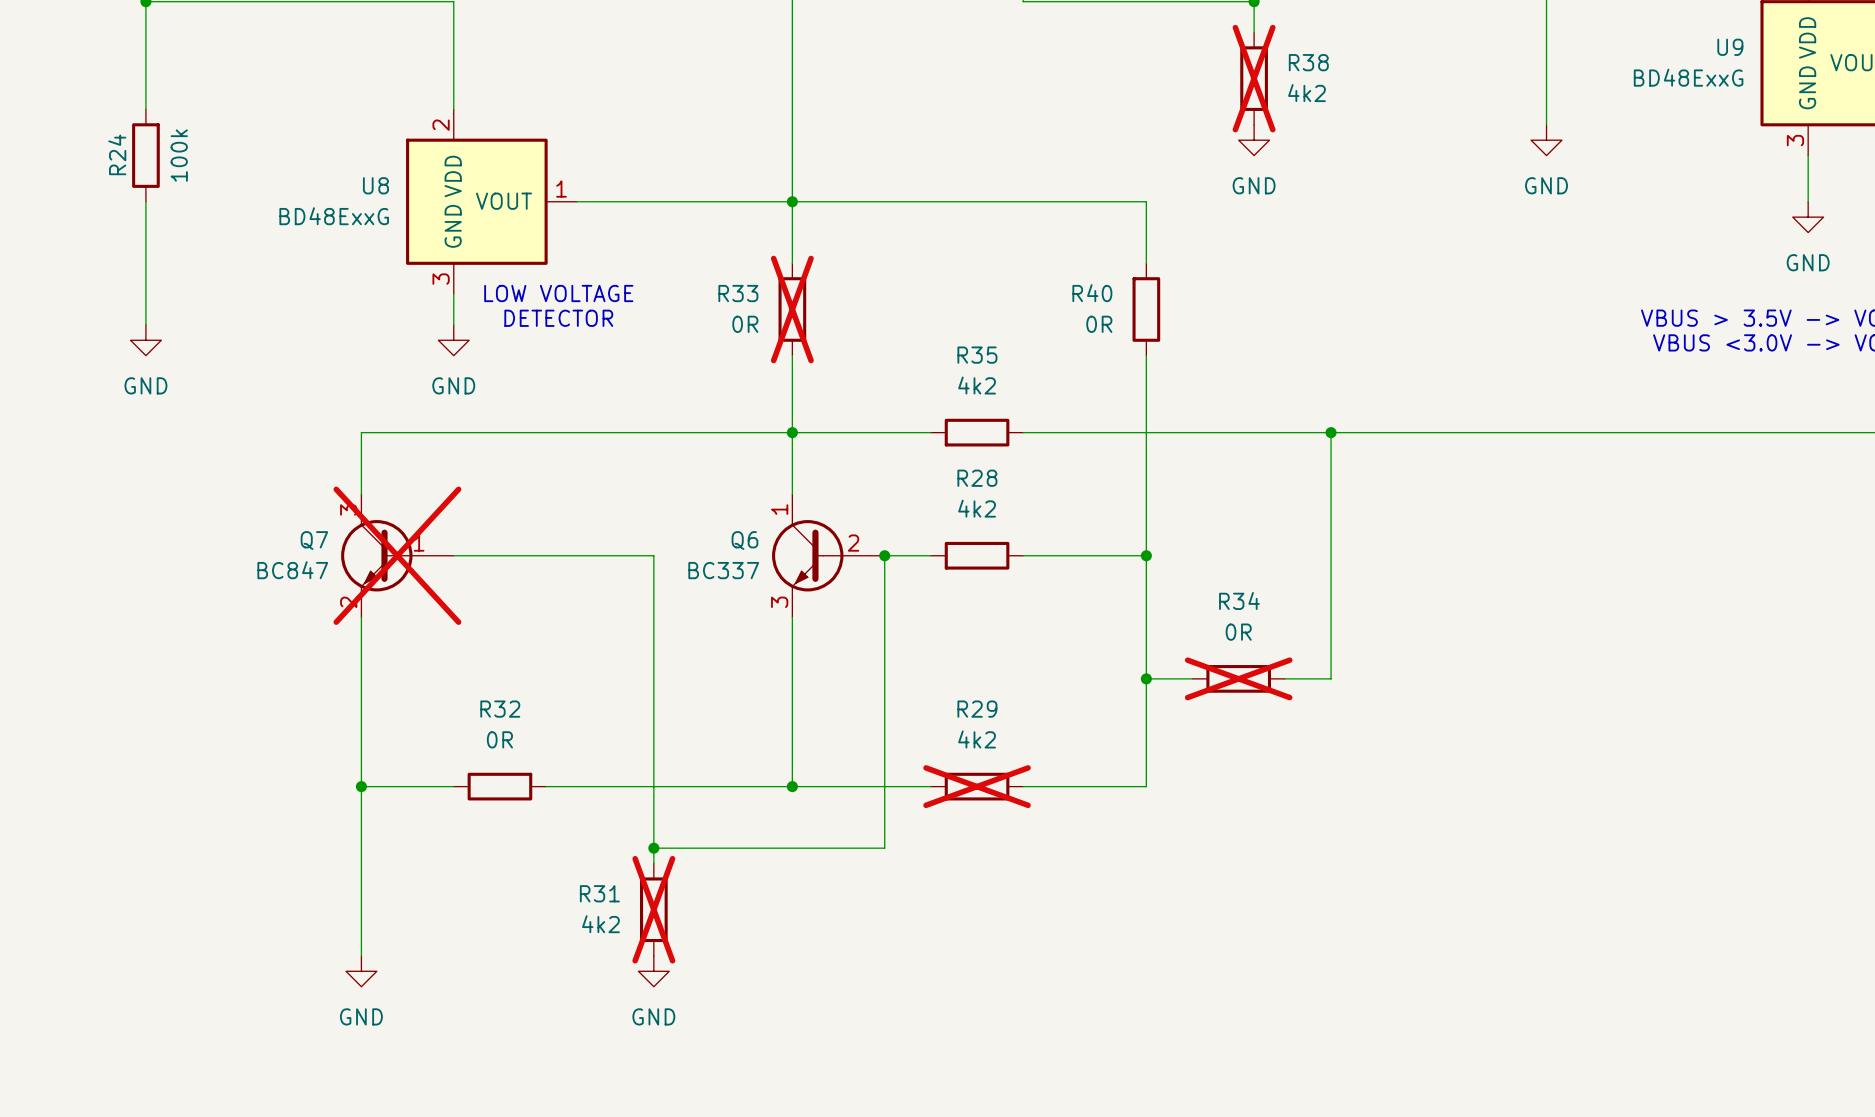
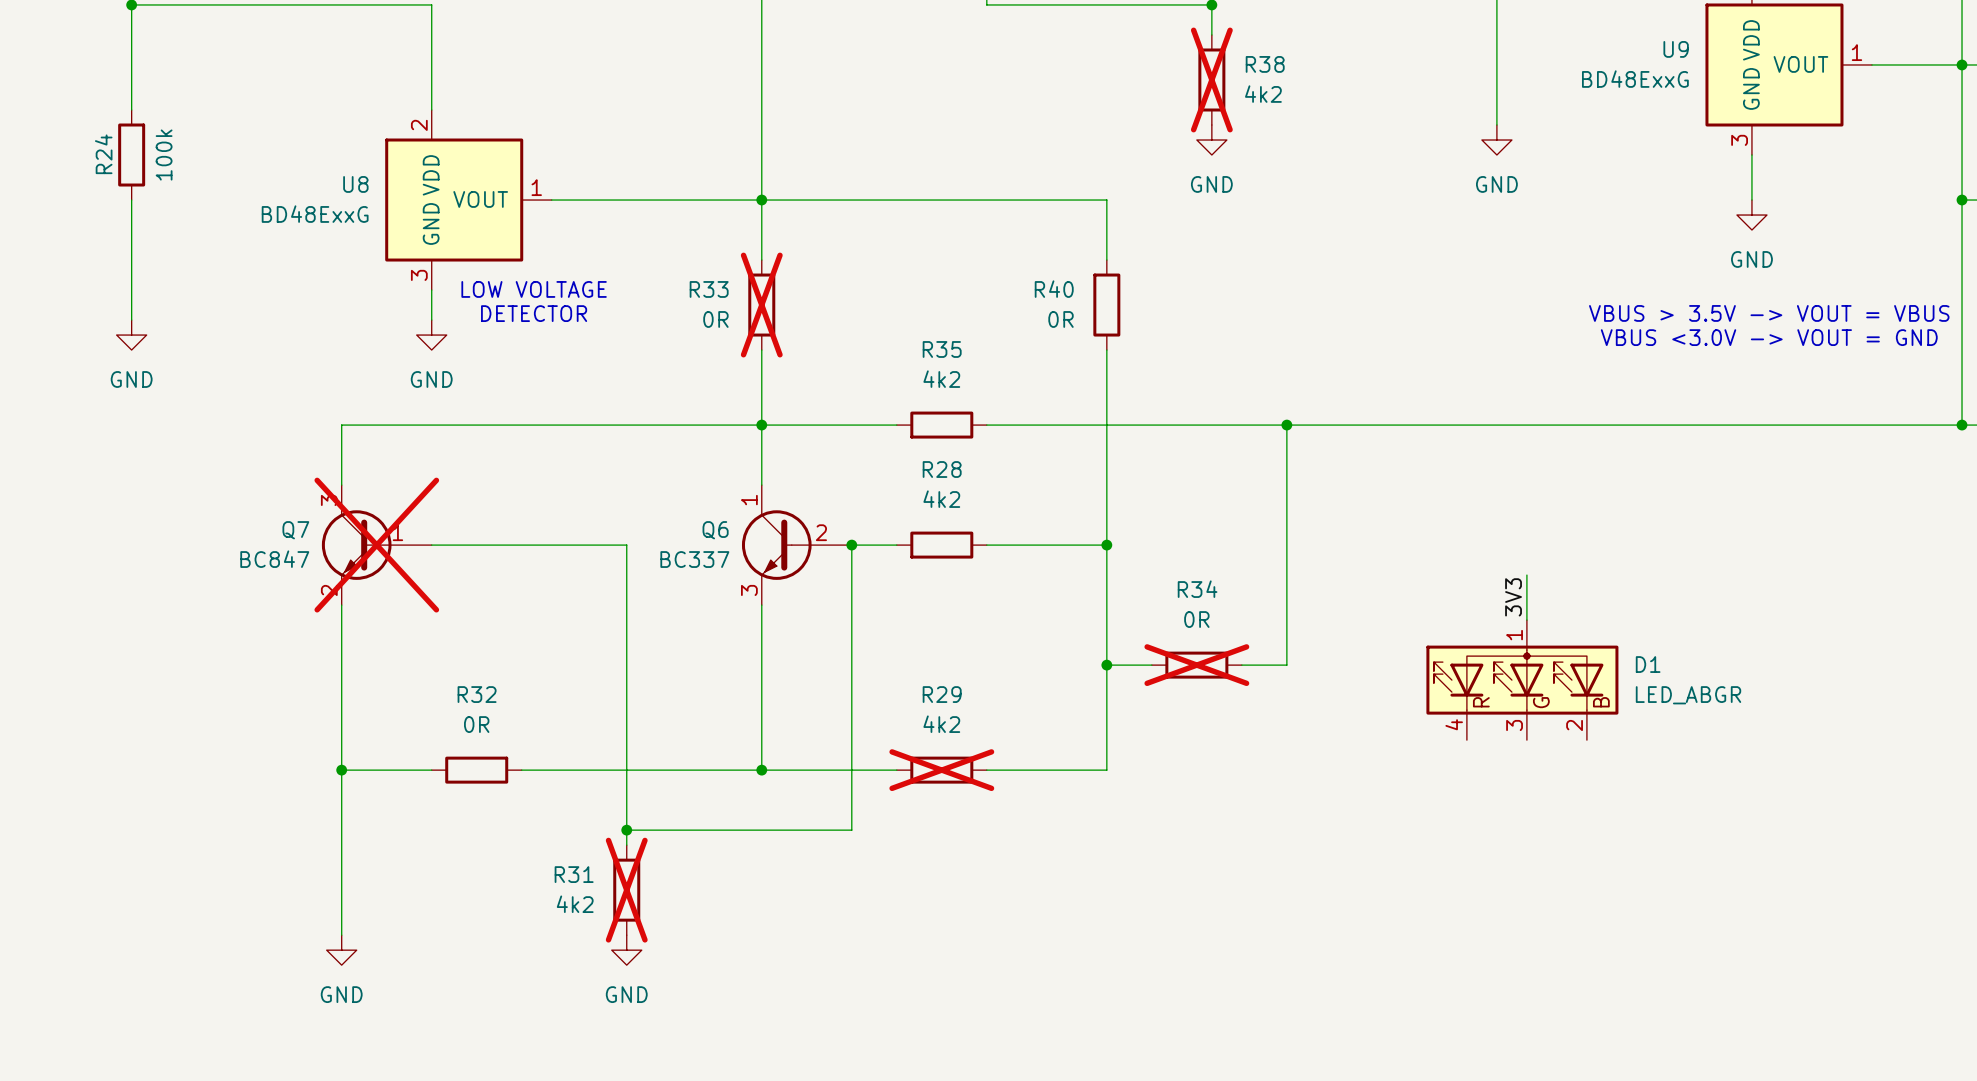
wire: none -> (1526, 575) (1526, 620)
label: none -> 3V3 (1513, 597)
D1: none -> LED_ABGR (1522, 680)

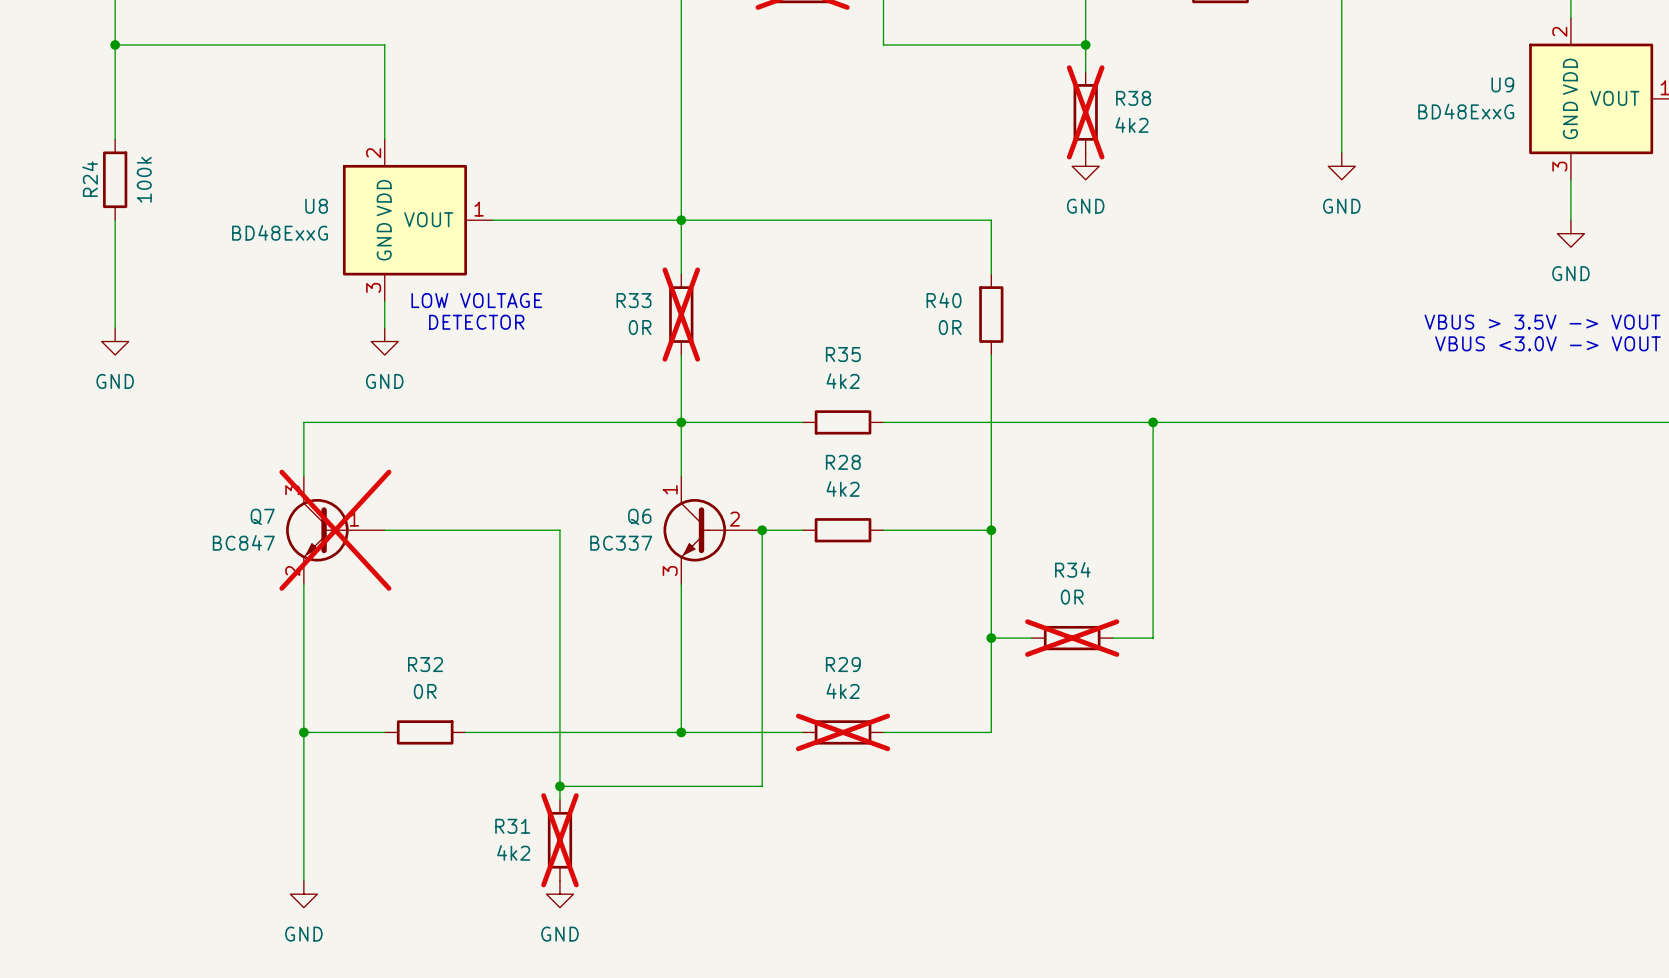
wire: (1526, 575) (1526, 620) -> none
label: 3V3 (1513, 597) -> none
D1: LED_ABGR (1522, 680) -> none

